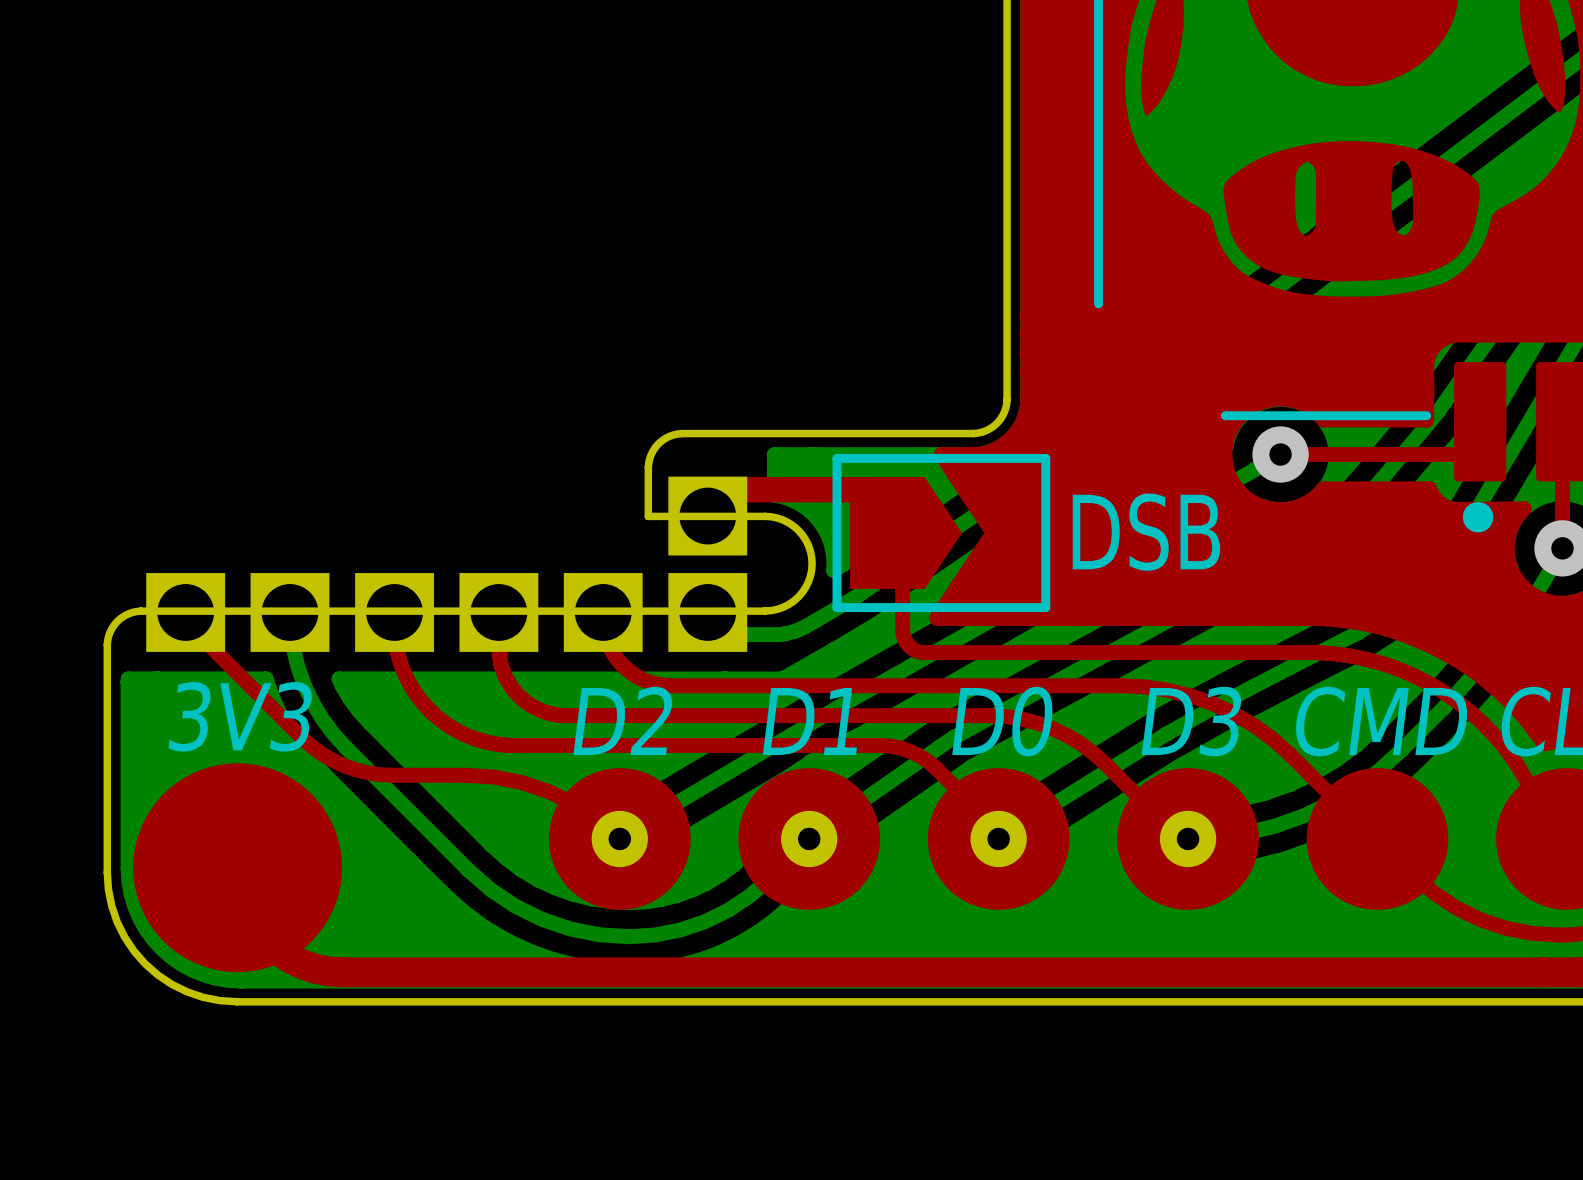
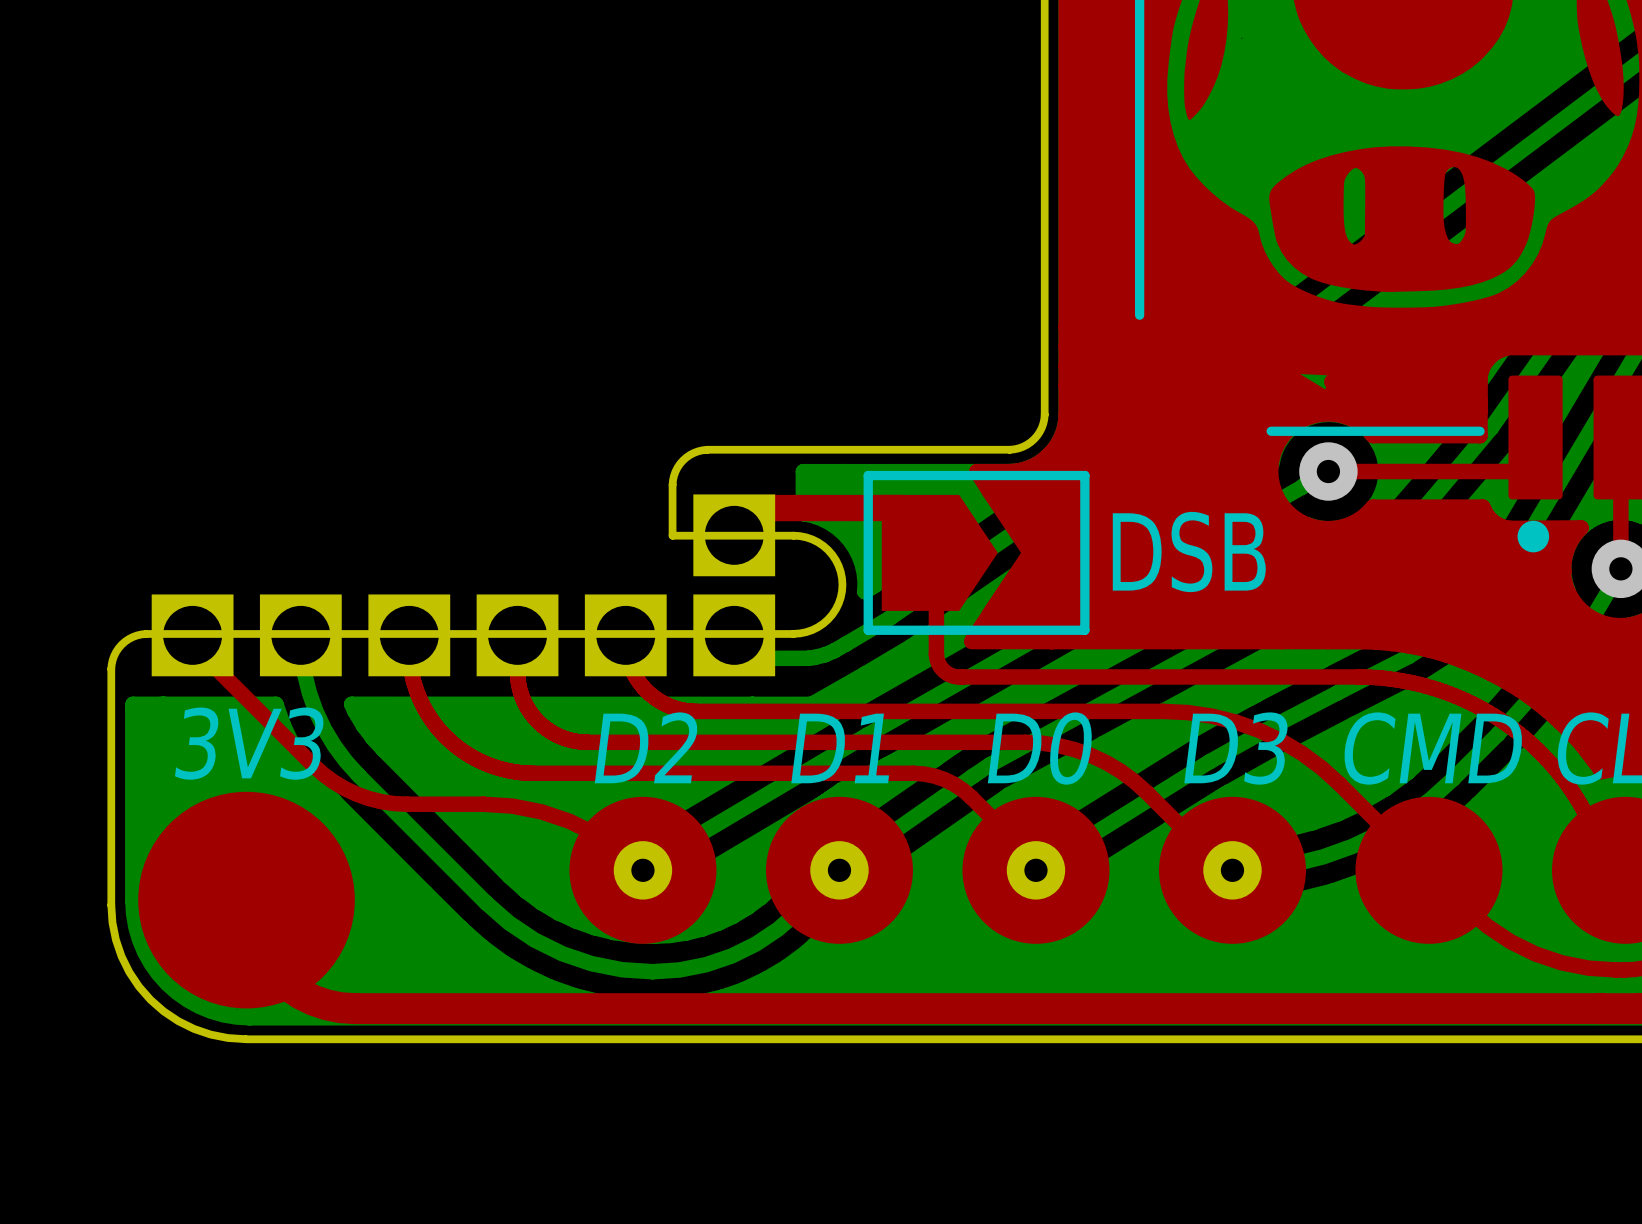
top track: (1404, 360) (1247, 357) (1285, 375) -> (1457, 373) (1240, 363)

